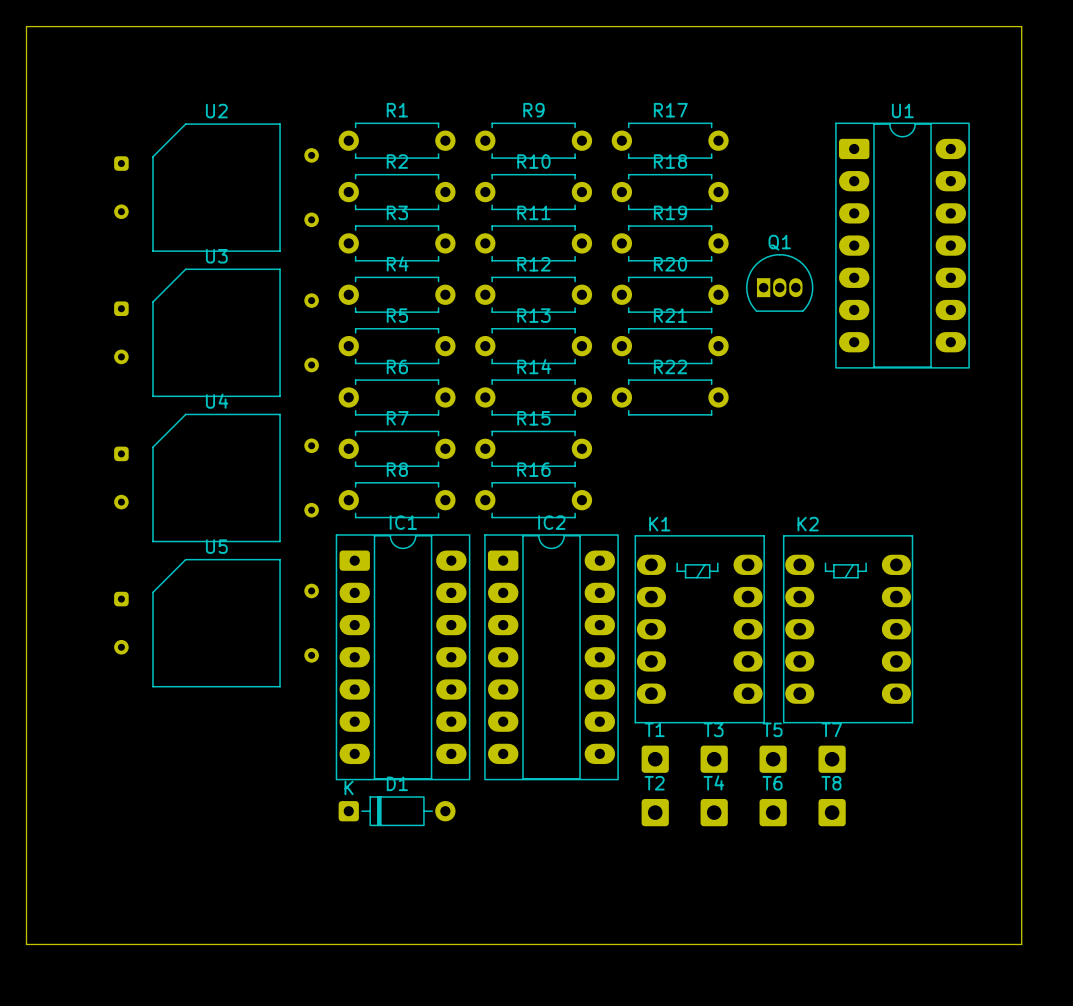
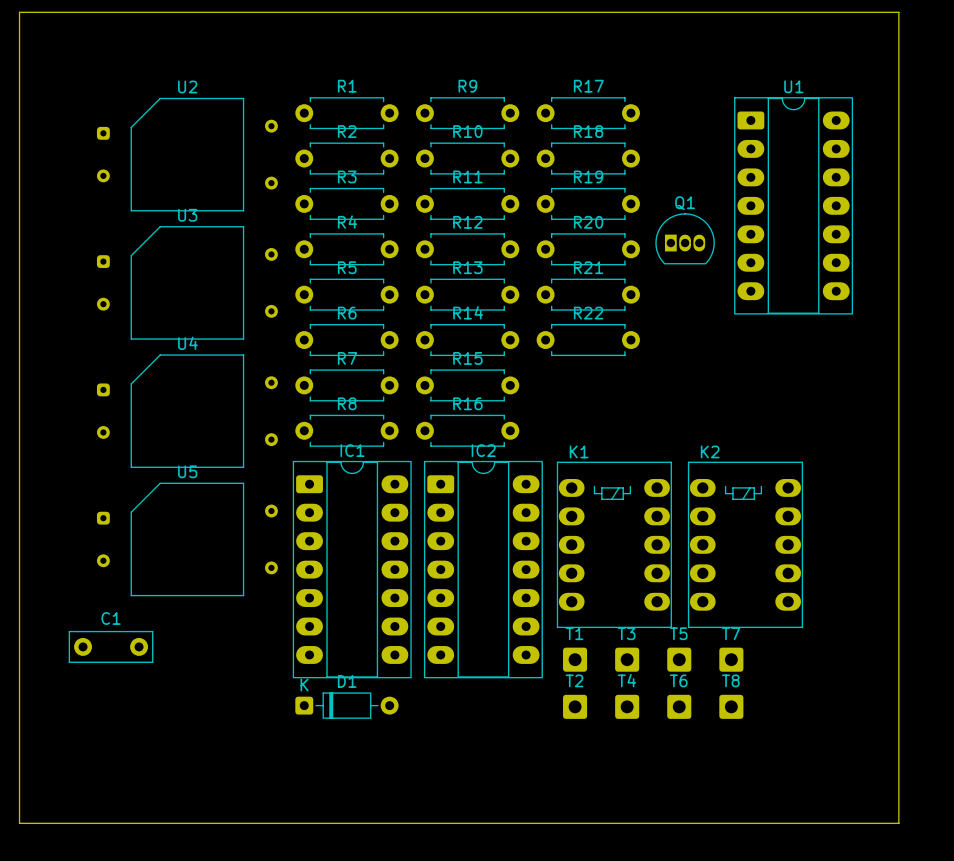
C1: none -> (111, 646)

